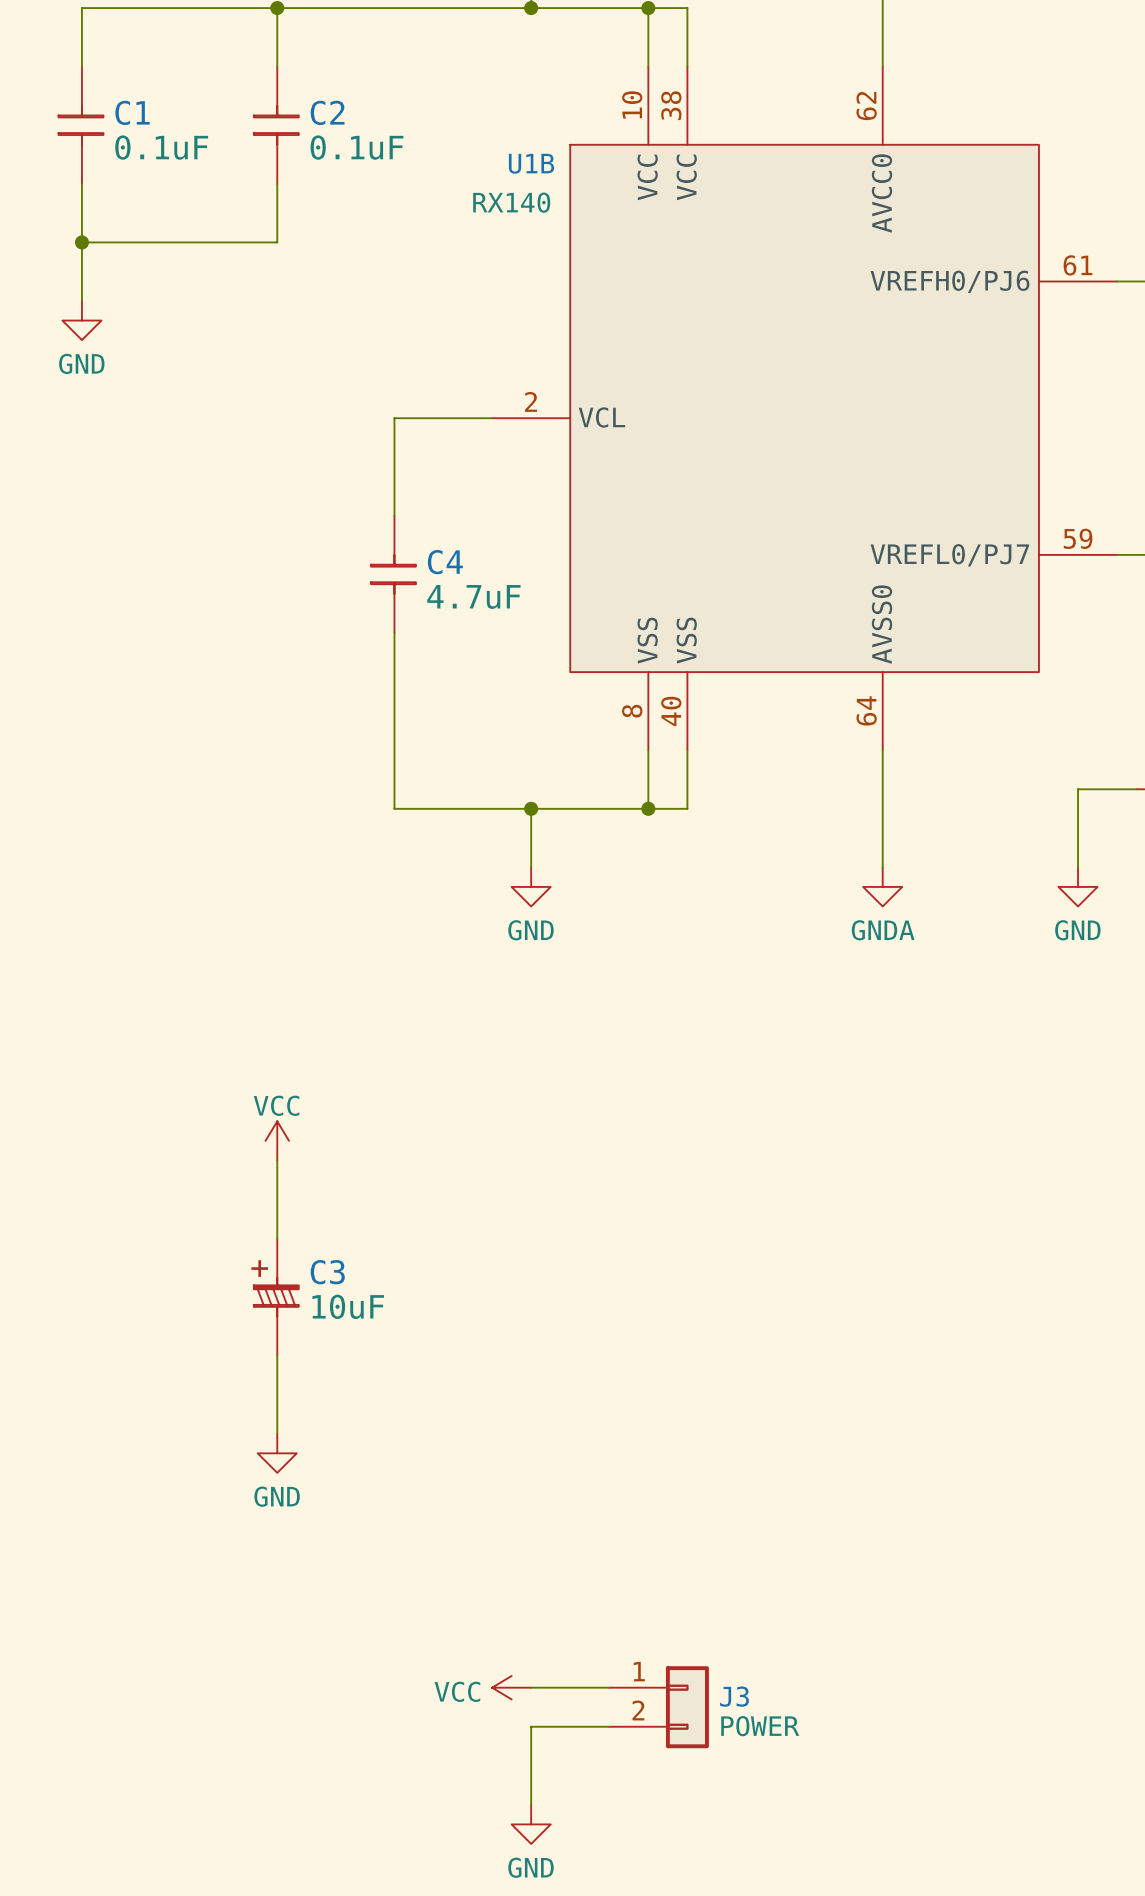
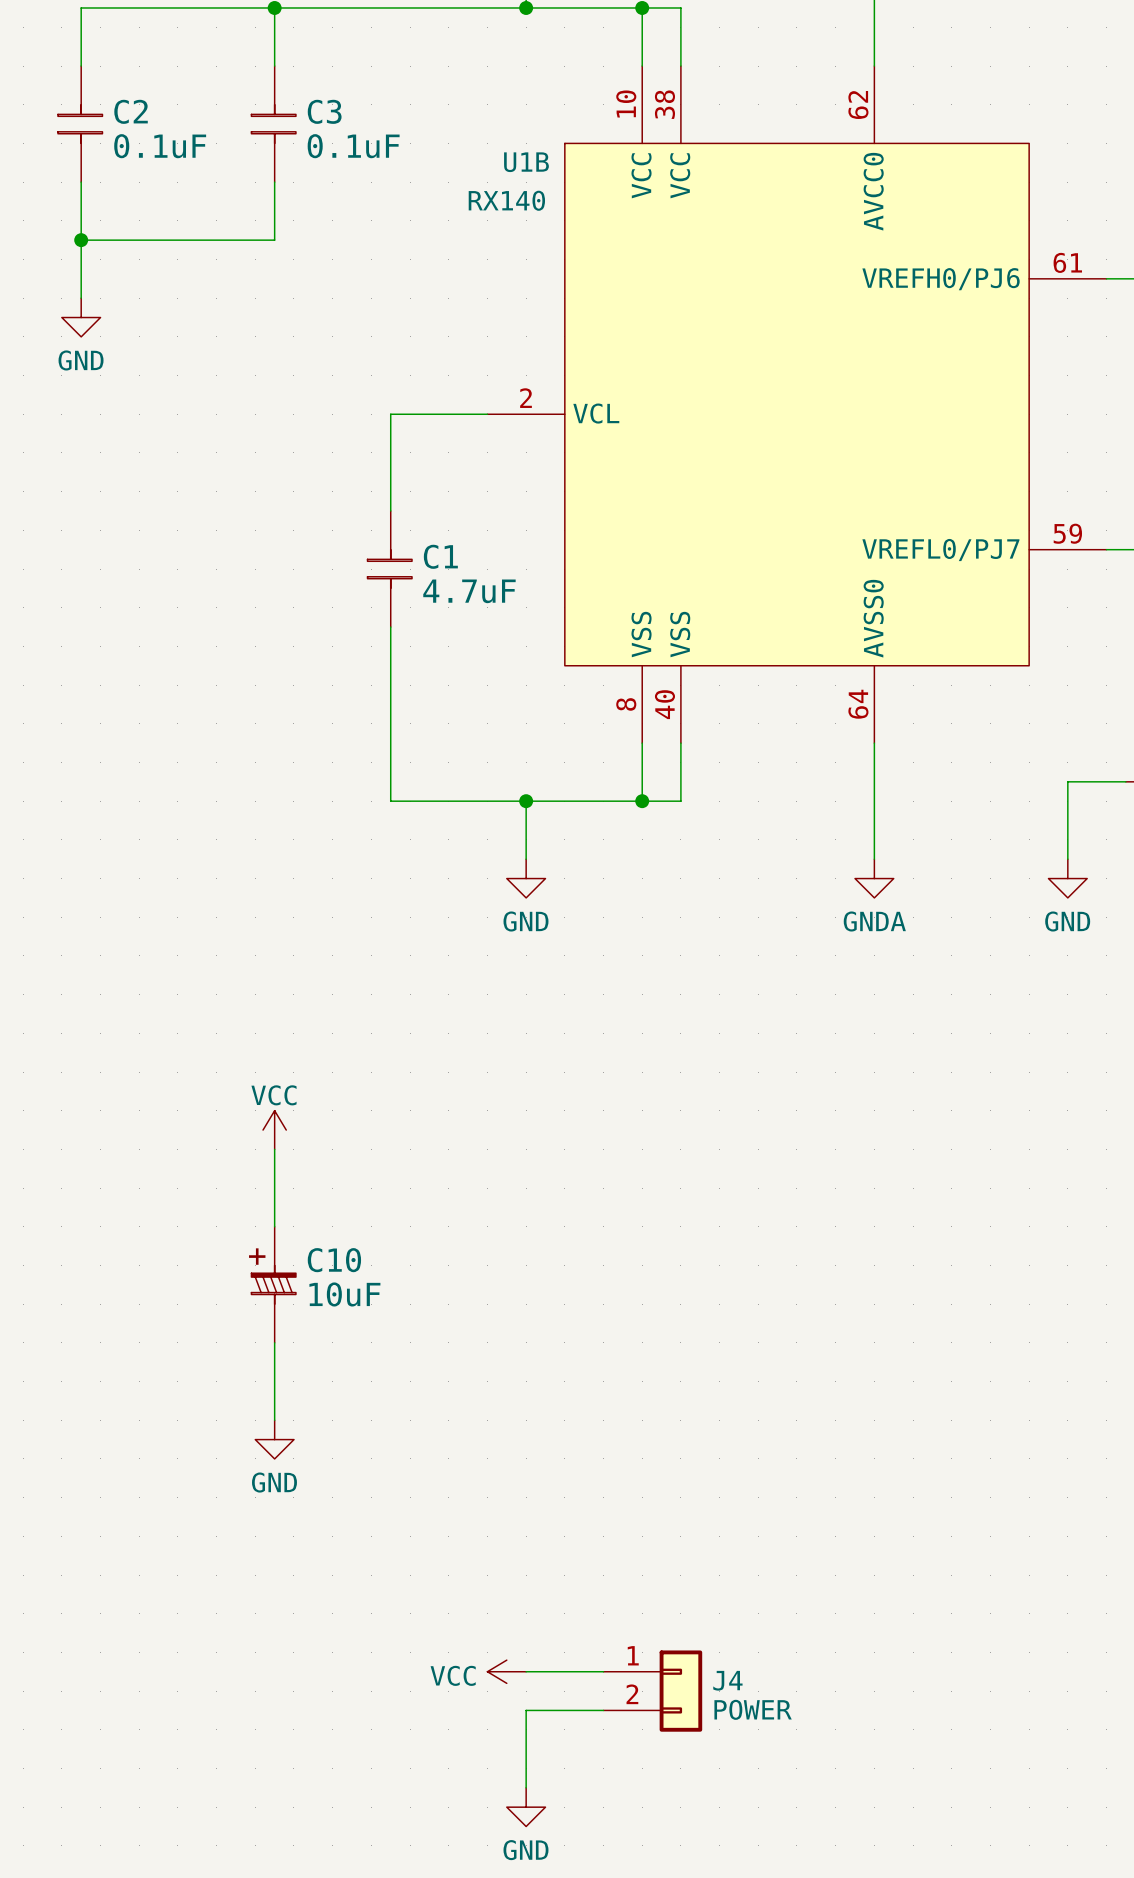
C1 name: C1 (132, 112) -> C2 (131, 111)
C2 name: C2 (327, 112) -> C3 (324, 111)
C4 name: C4 (445, 562) -> C1 (440, 556)
C3 name: C3 (327, 1272) -> C10 (334, 1260)
J3 name: J3 (734, 1696) -> J4 (727, 1680)

